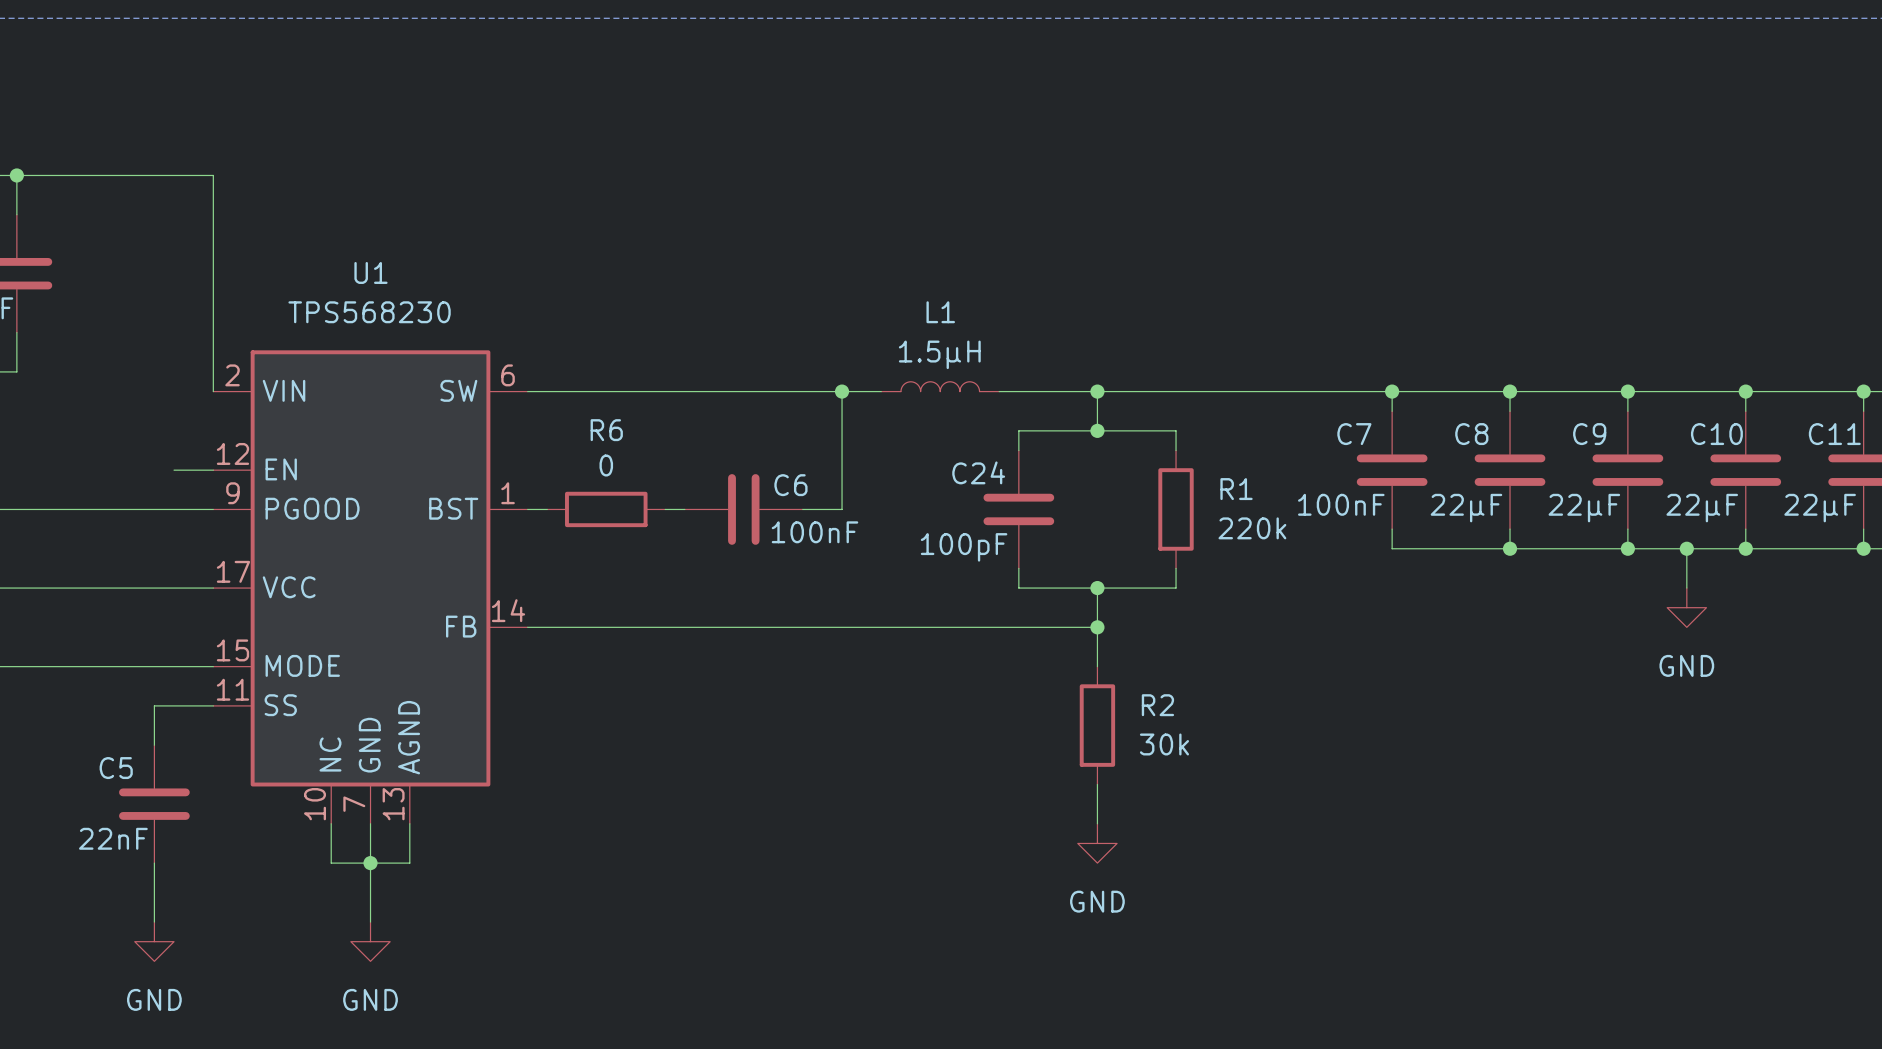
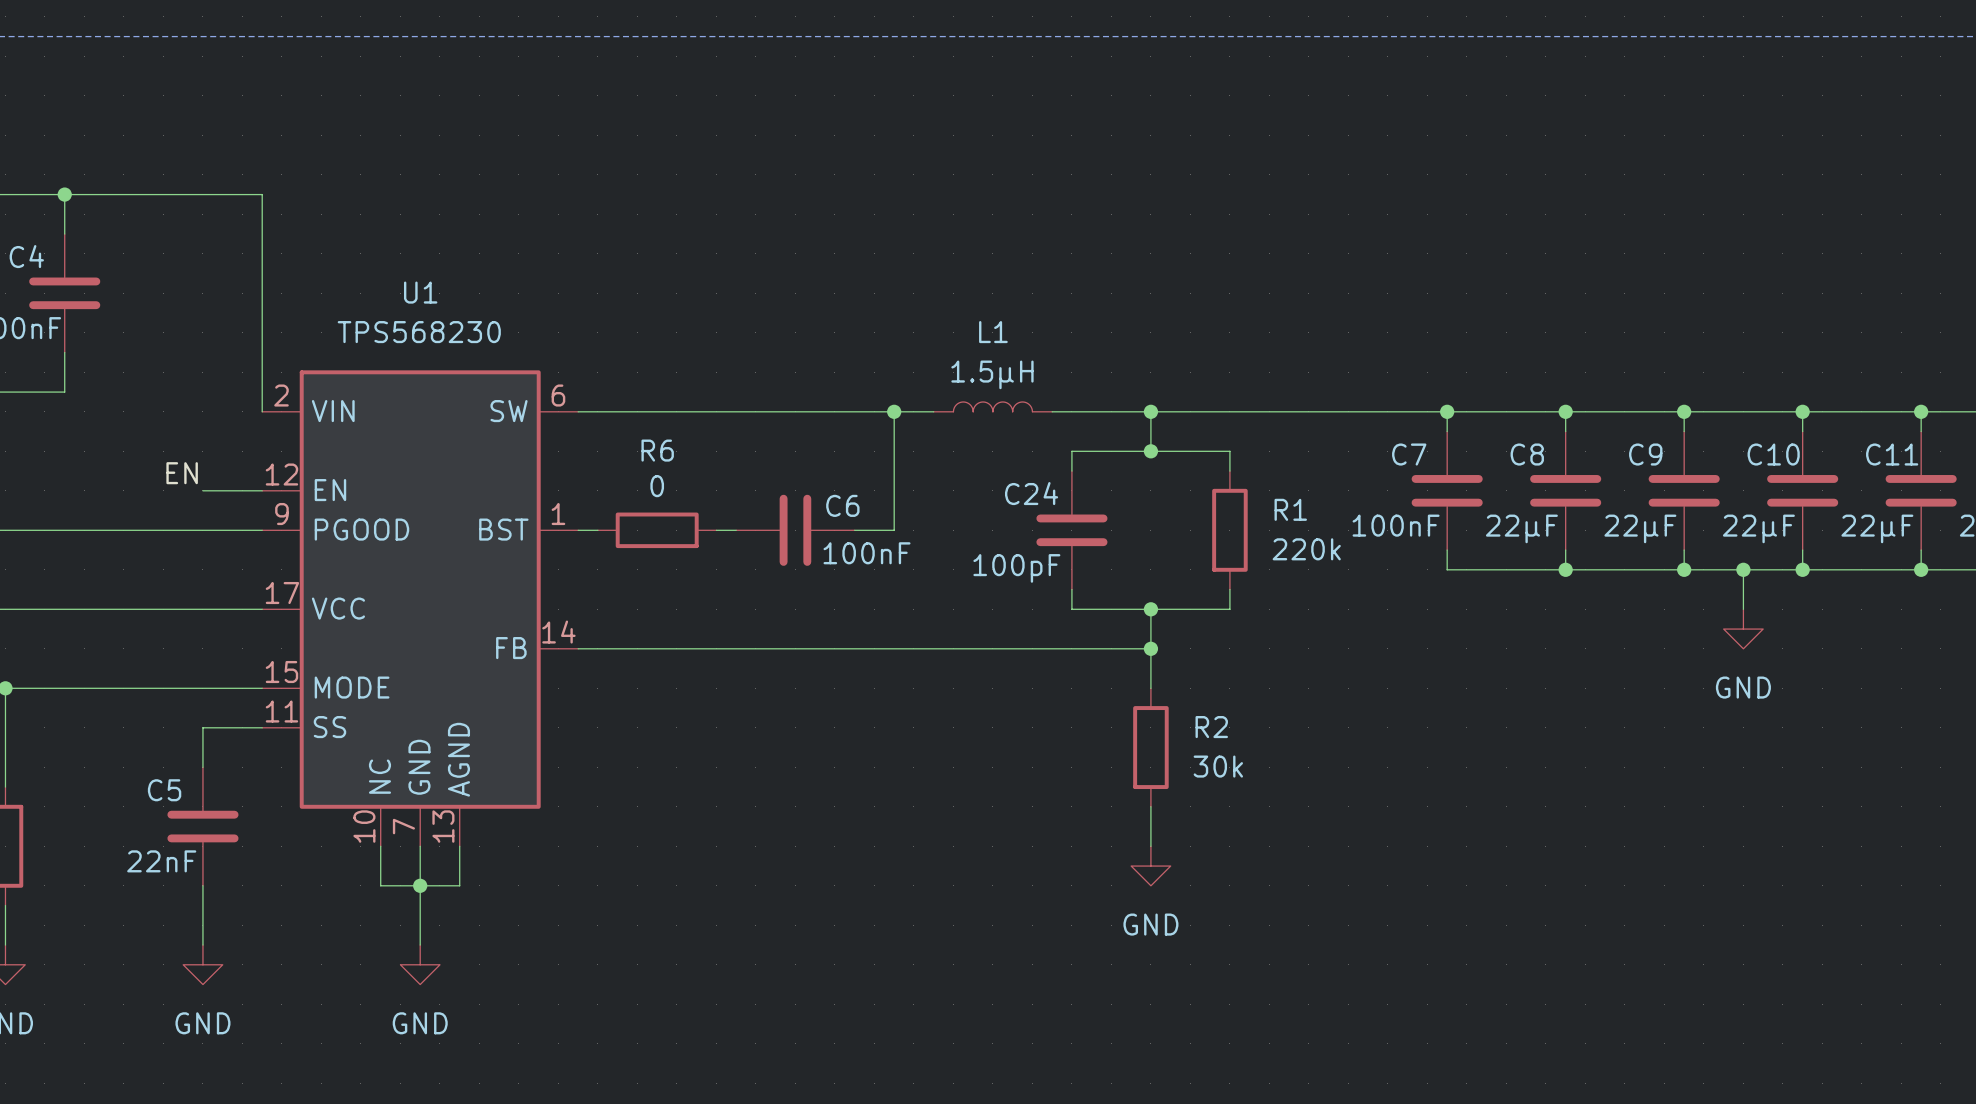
label: none -> EN (182, 473)
wire: none -> (202, 490) (222, 490)

